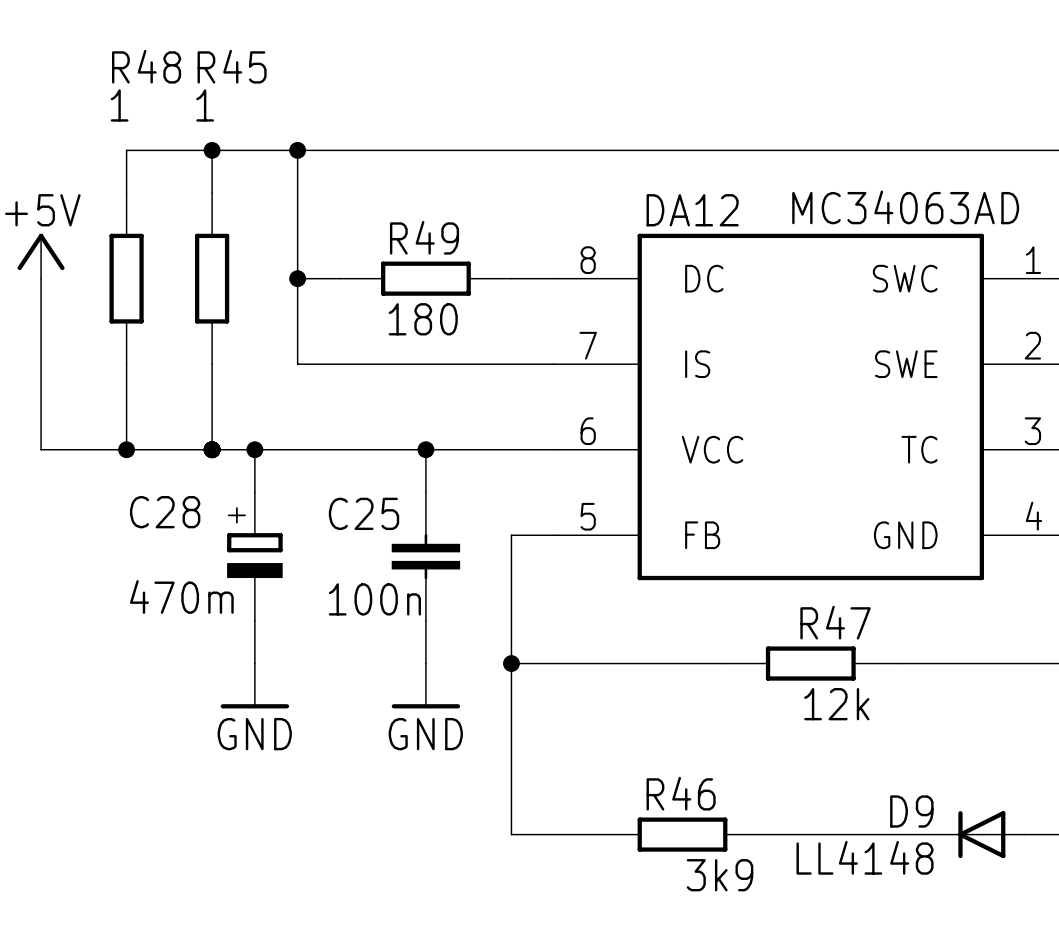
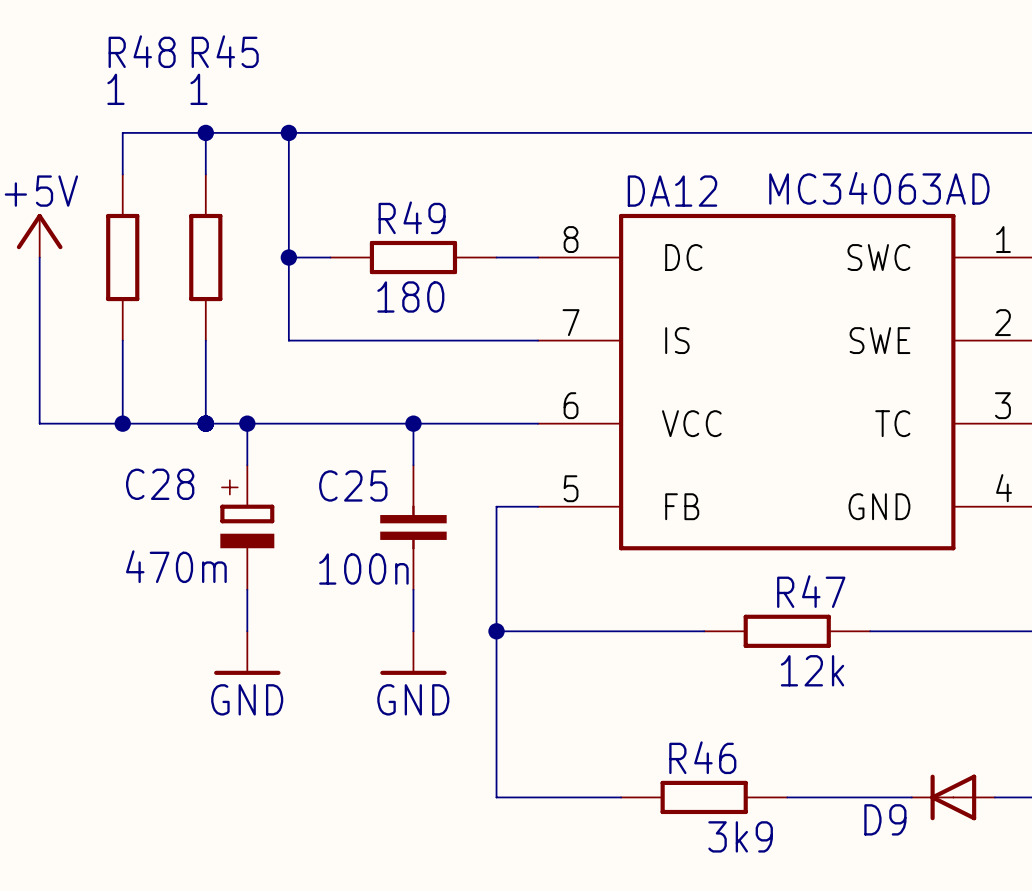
D9 name position: D9 (911, 811) -> D9 (885, 819)
R46 position: (682, 834) -> (704, 797)
D9 value: LL4148 (865, 857) -> none

